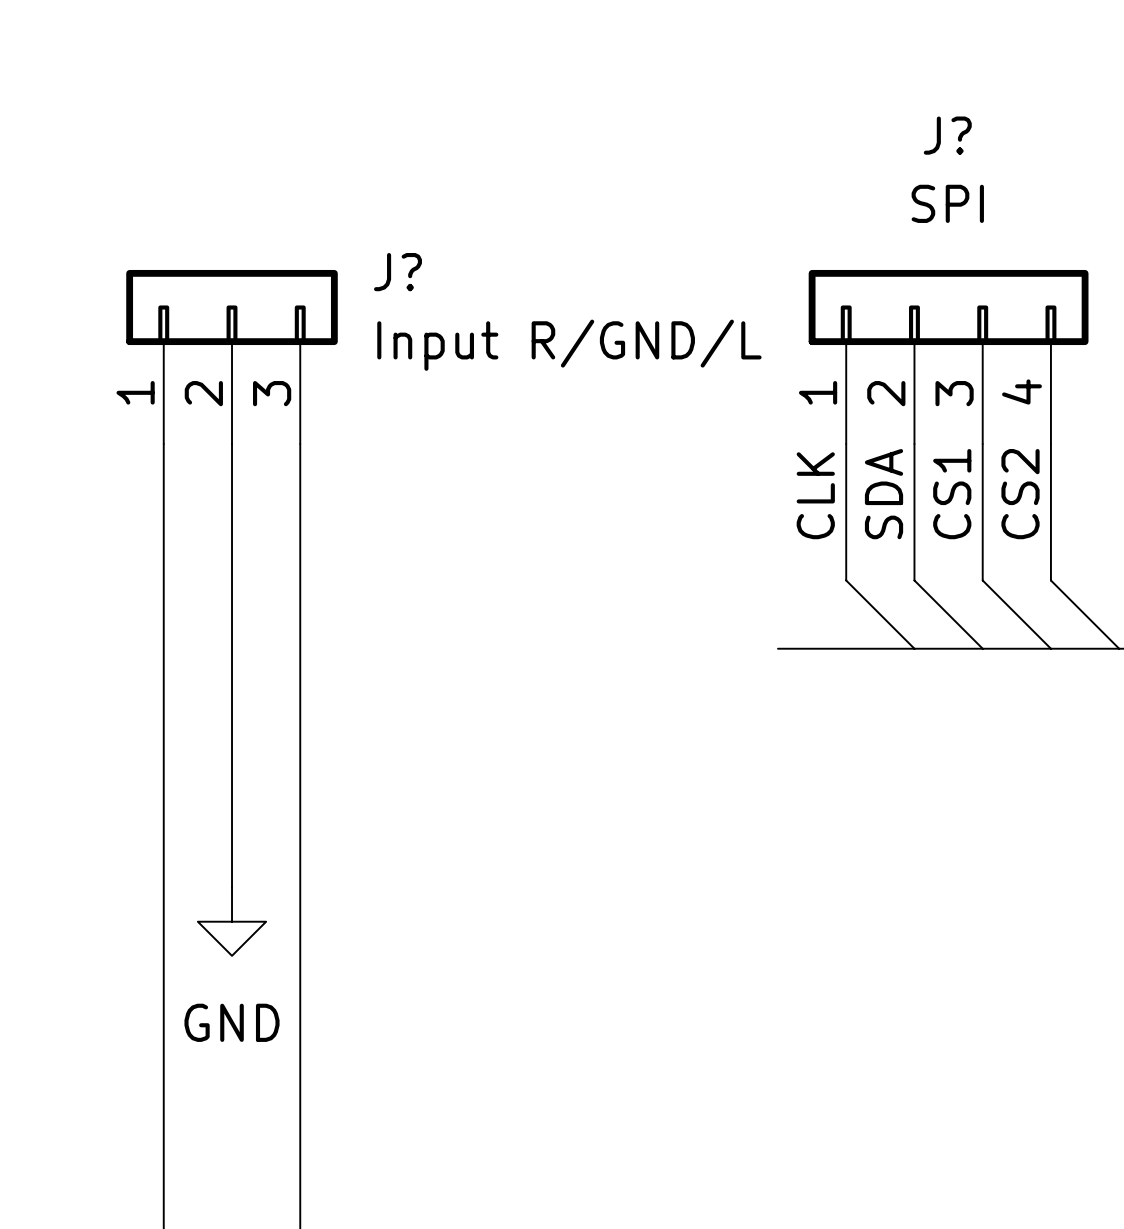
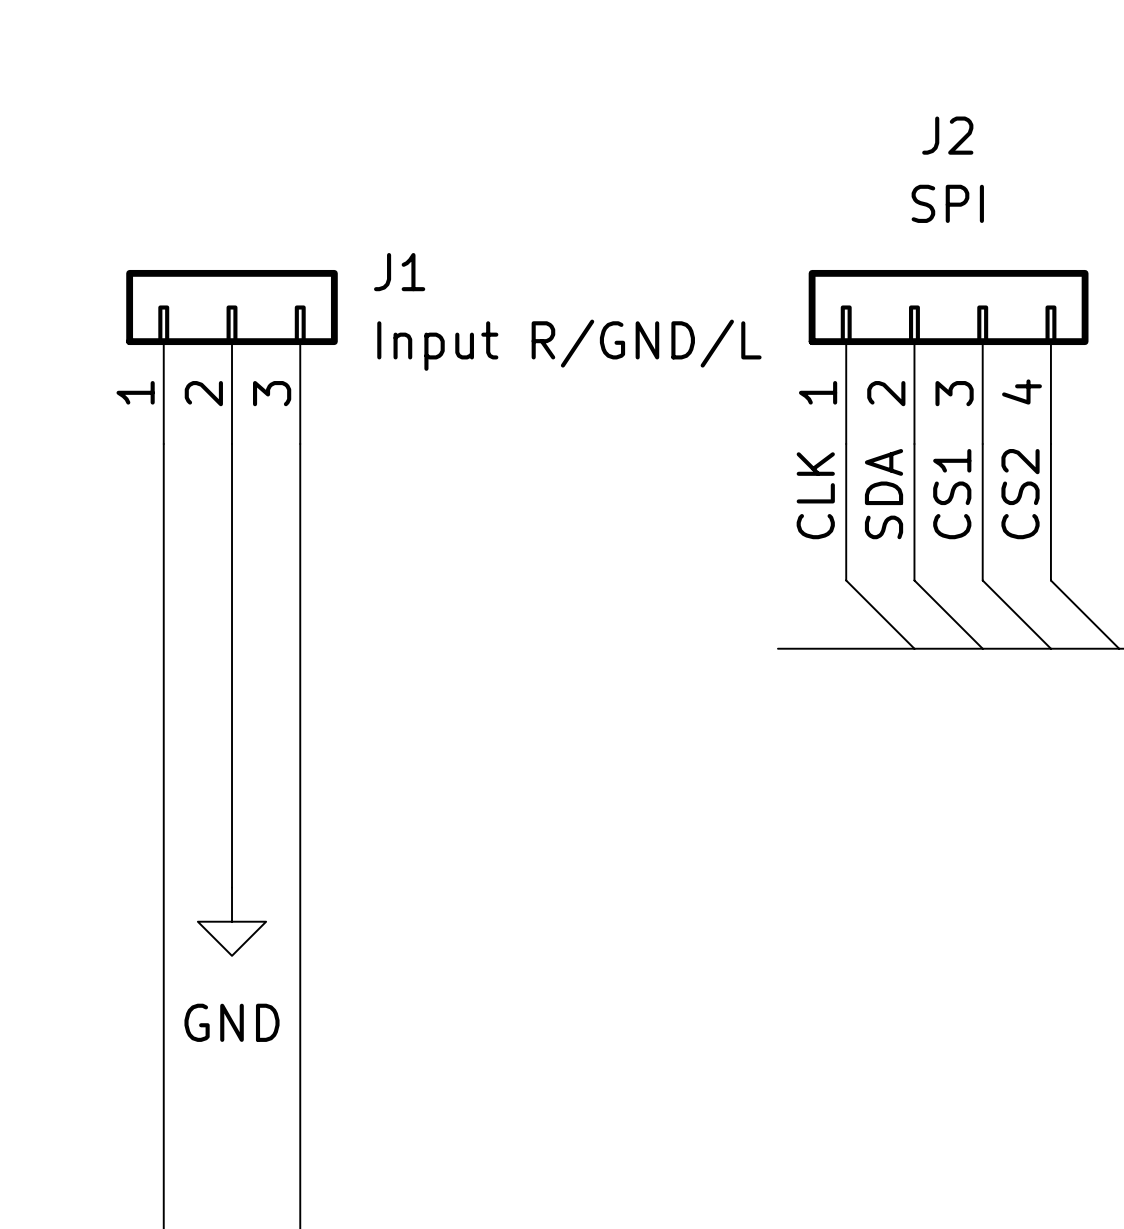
J? name: J? (947, 135) -> J2 (947, 135)
J? name: J? (398, 272) -> J1 (399, 272)

